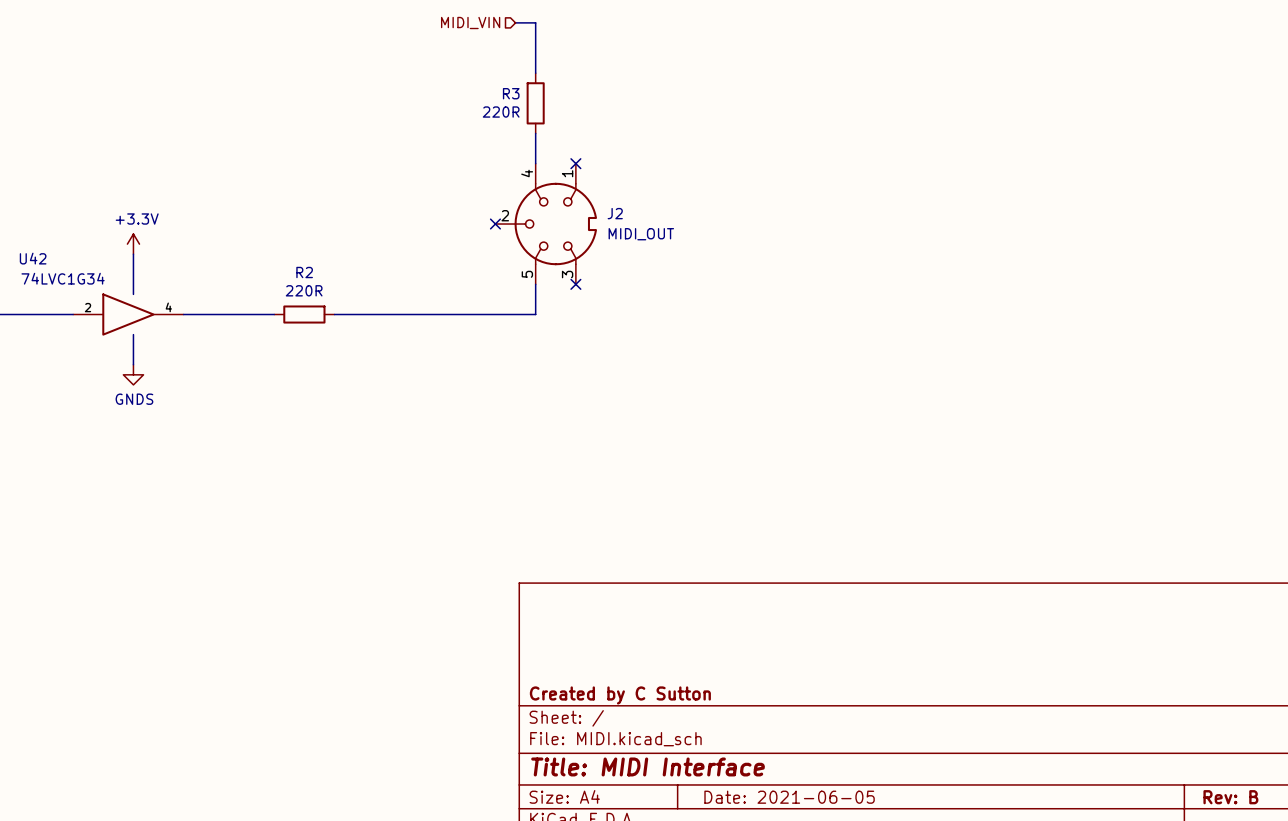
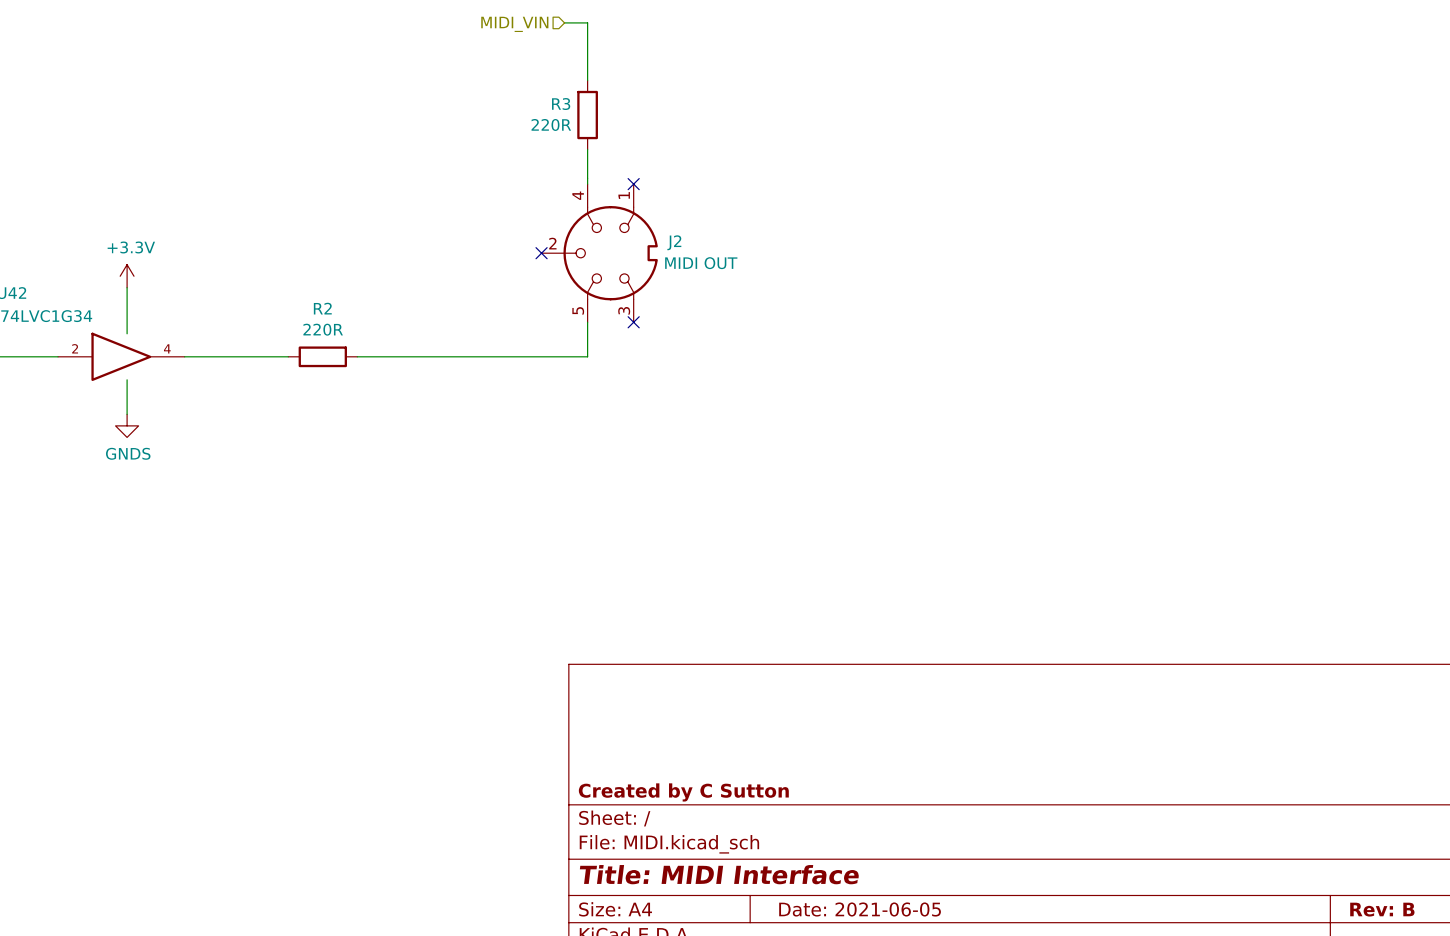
J2 value: MIDI_OUT (641, 234) -> MIDI OUT (701, 263)

